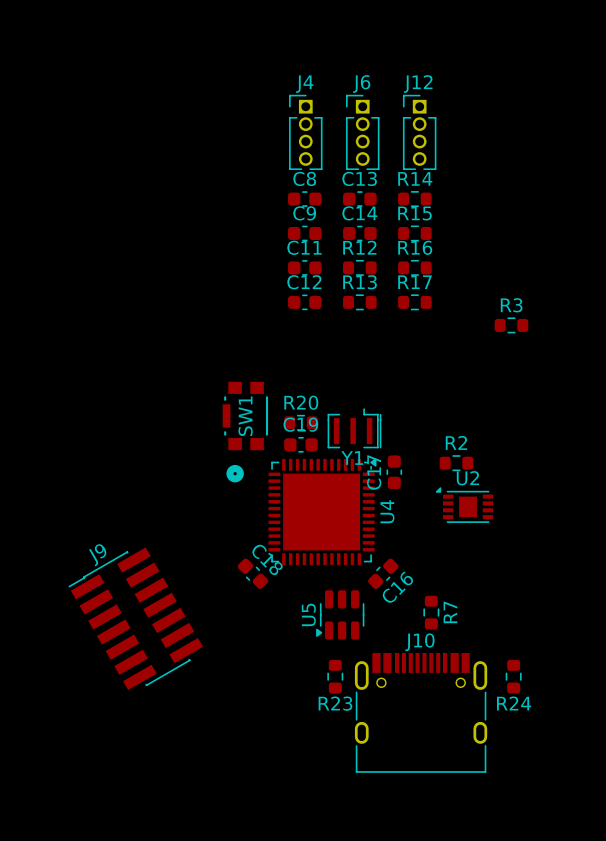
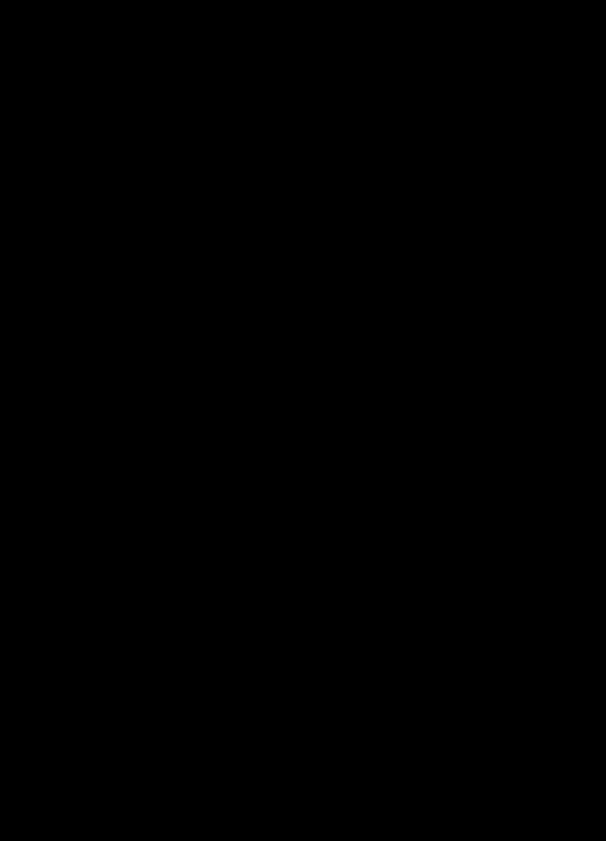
J4: (305, 132) -> none
J6: (362, 132) -> none
J12: (419, 132) -> none
C8: (304, 199) -> none
C13: (359, 199) -> none
R14: (414, 199) -> none
C9: (304, 233) -> none
C14: (359, 233) -> none
R15: (414, 233) -> none
C11: (304, 267) -> none
R12: (359, 267) -> none
R16: (414, 267) -> none
C12: (304, 302) -> none
R13: (359, 302) -> none
R17: (414, 302) -> none
R3: (511, 325) -> none
R20: (300, 422) -> none
Y1: (354, 428) -> none
SW1: (245, 432) -> none
C19: (300, 444) -> none
R2: (456, 463) -> none
C17: (394, 472) -> none
U2: (464, 505) -> none
U4: (322, 511) -> none
C18: (252, 573) -> none
C16: (383, 573) -> none
R7: (431, 612) -> none
U5: (340, 614) -> none
J9: (135, 618) -> none
R23: (335, 676) -> none
R24: (513, 676) -> none
J10: (421, 712) -> none

